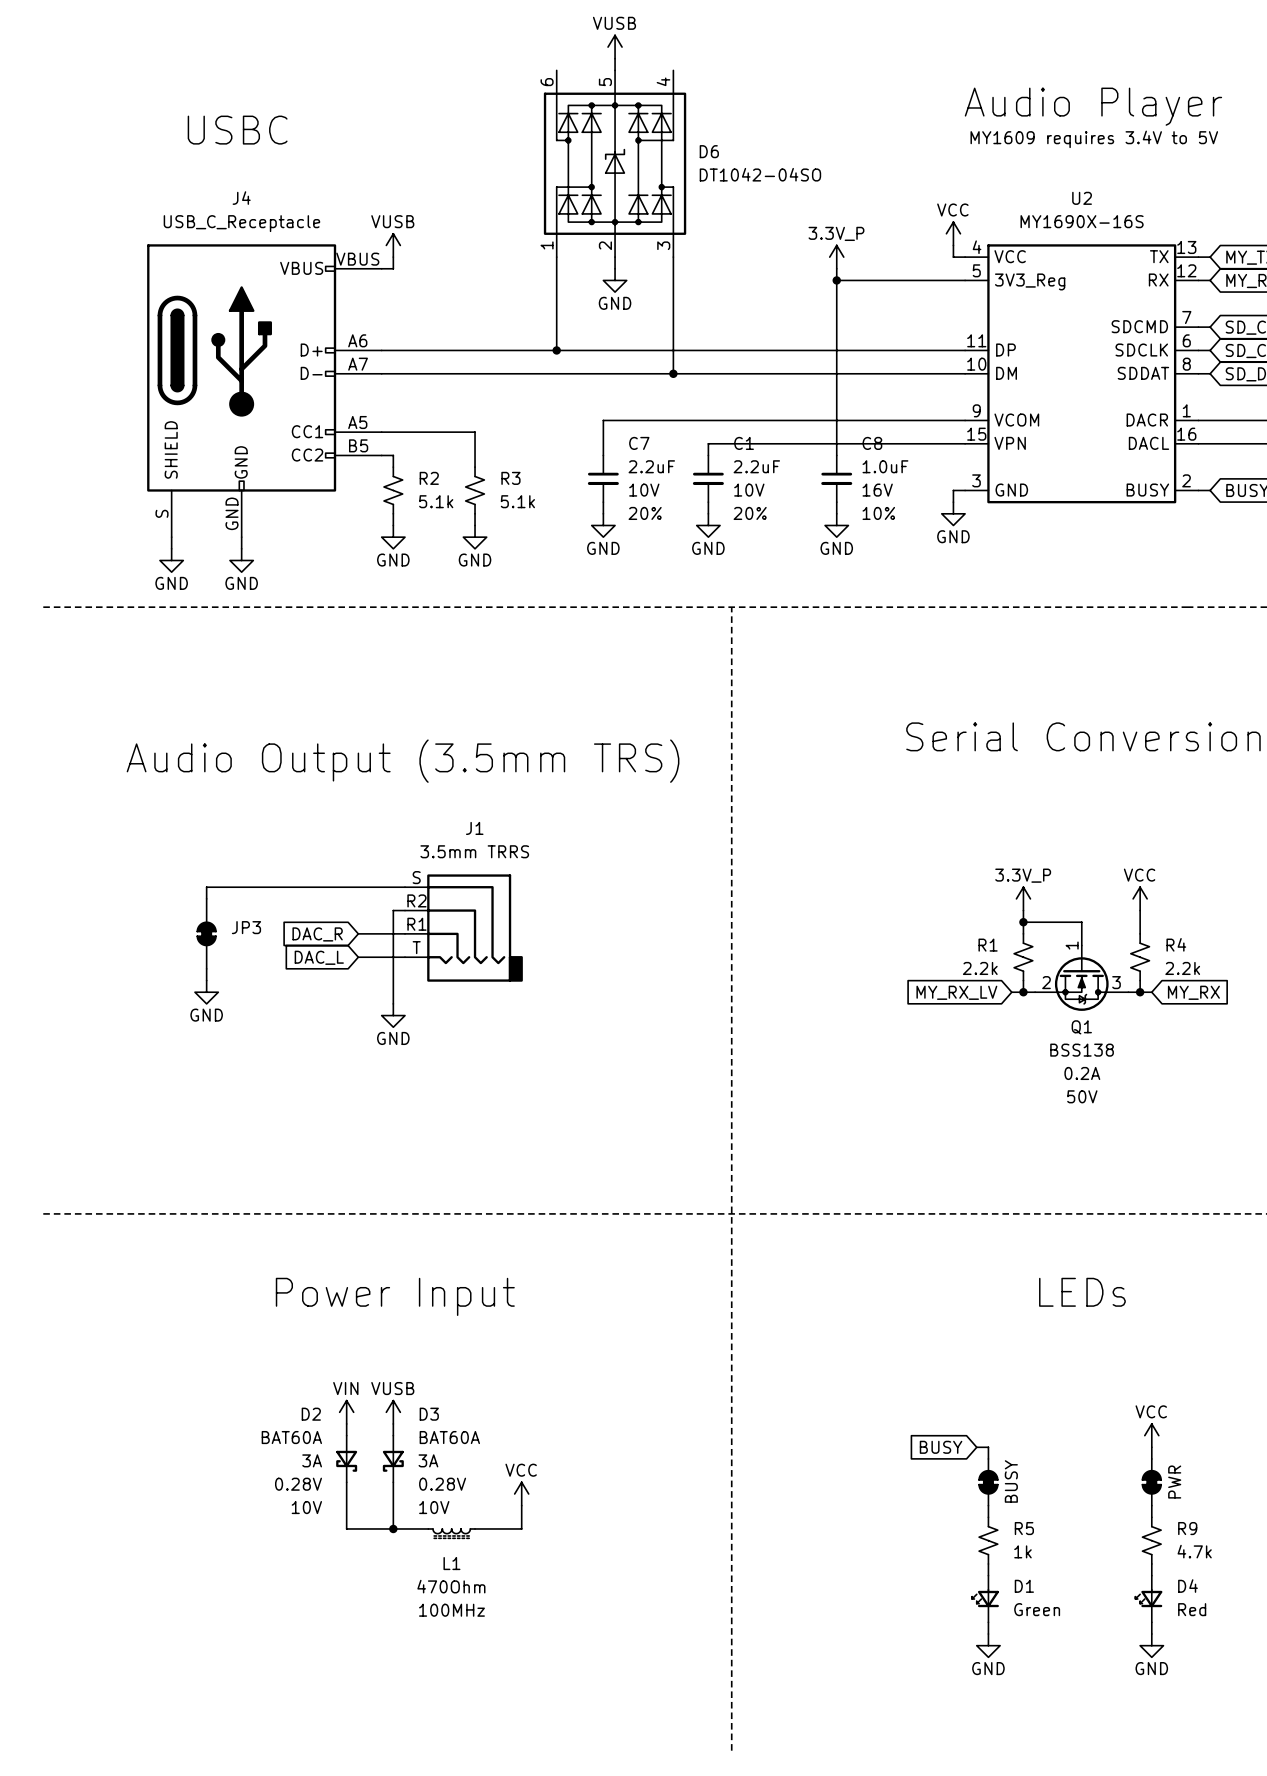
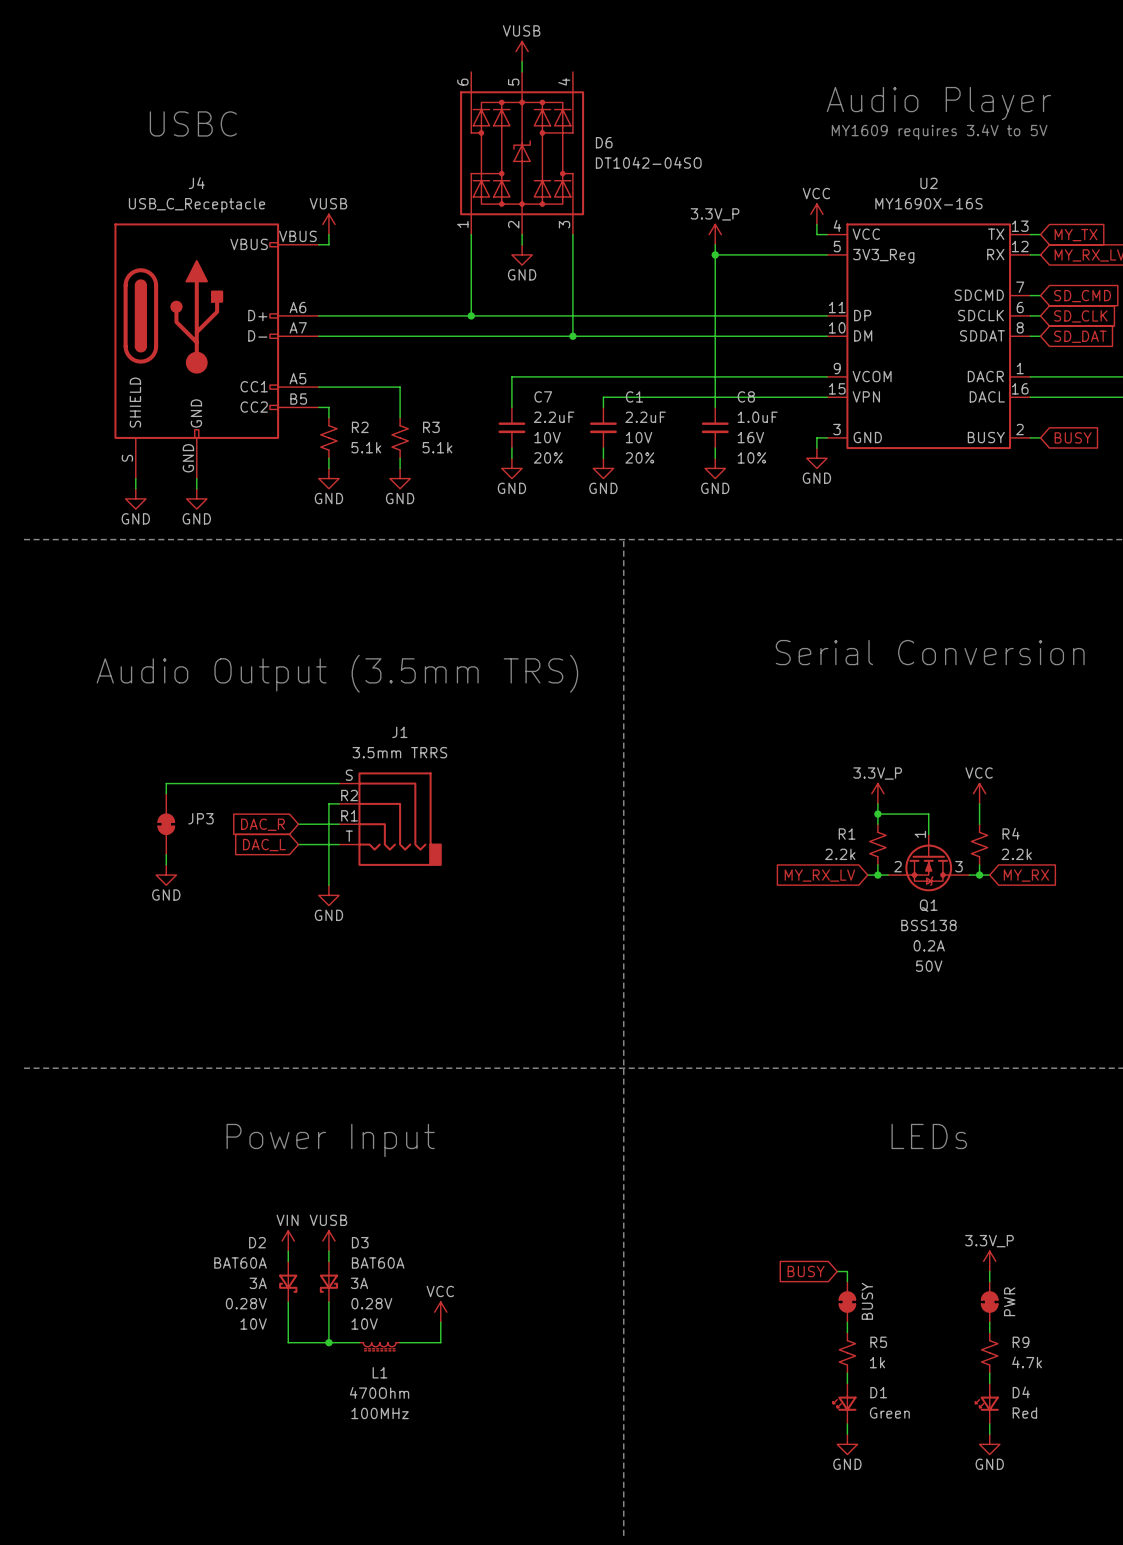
power symbol: VCC (1151, 1435) -> 3.3V_P (989, 1261)

